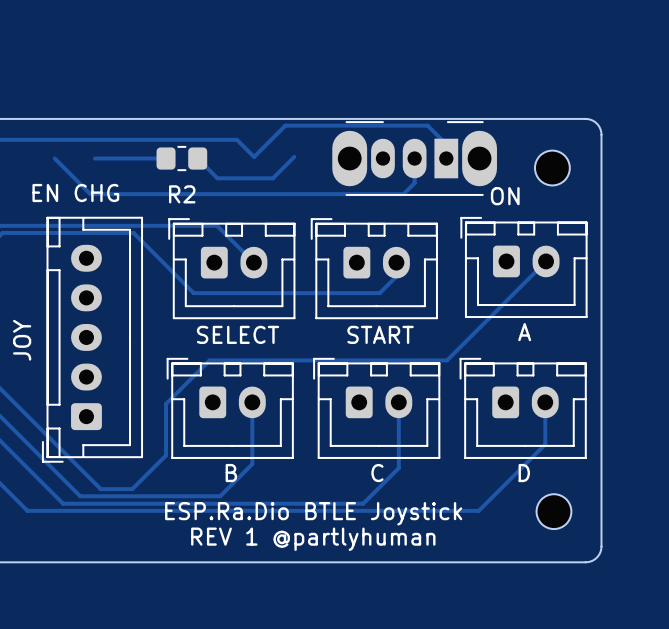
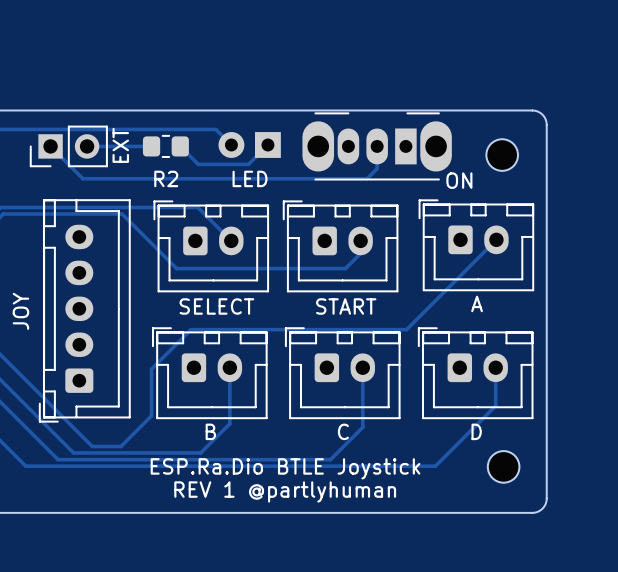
track: (254, 156) (285, 125) (427, 125) (446, 144) (446, 158) -> none
part: none -> LED (249, 144)
part: none -> EXT (68, 146)
text: EN CHG (75, 193) -> none

